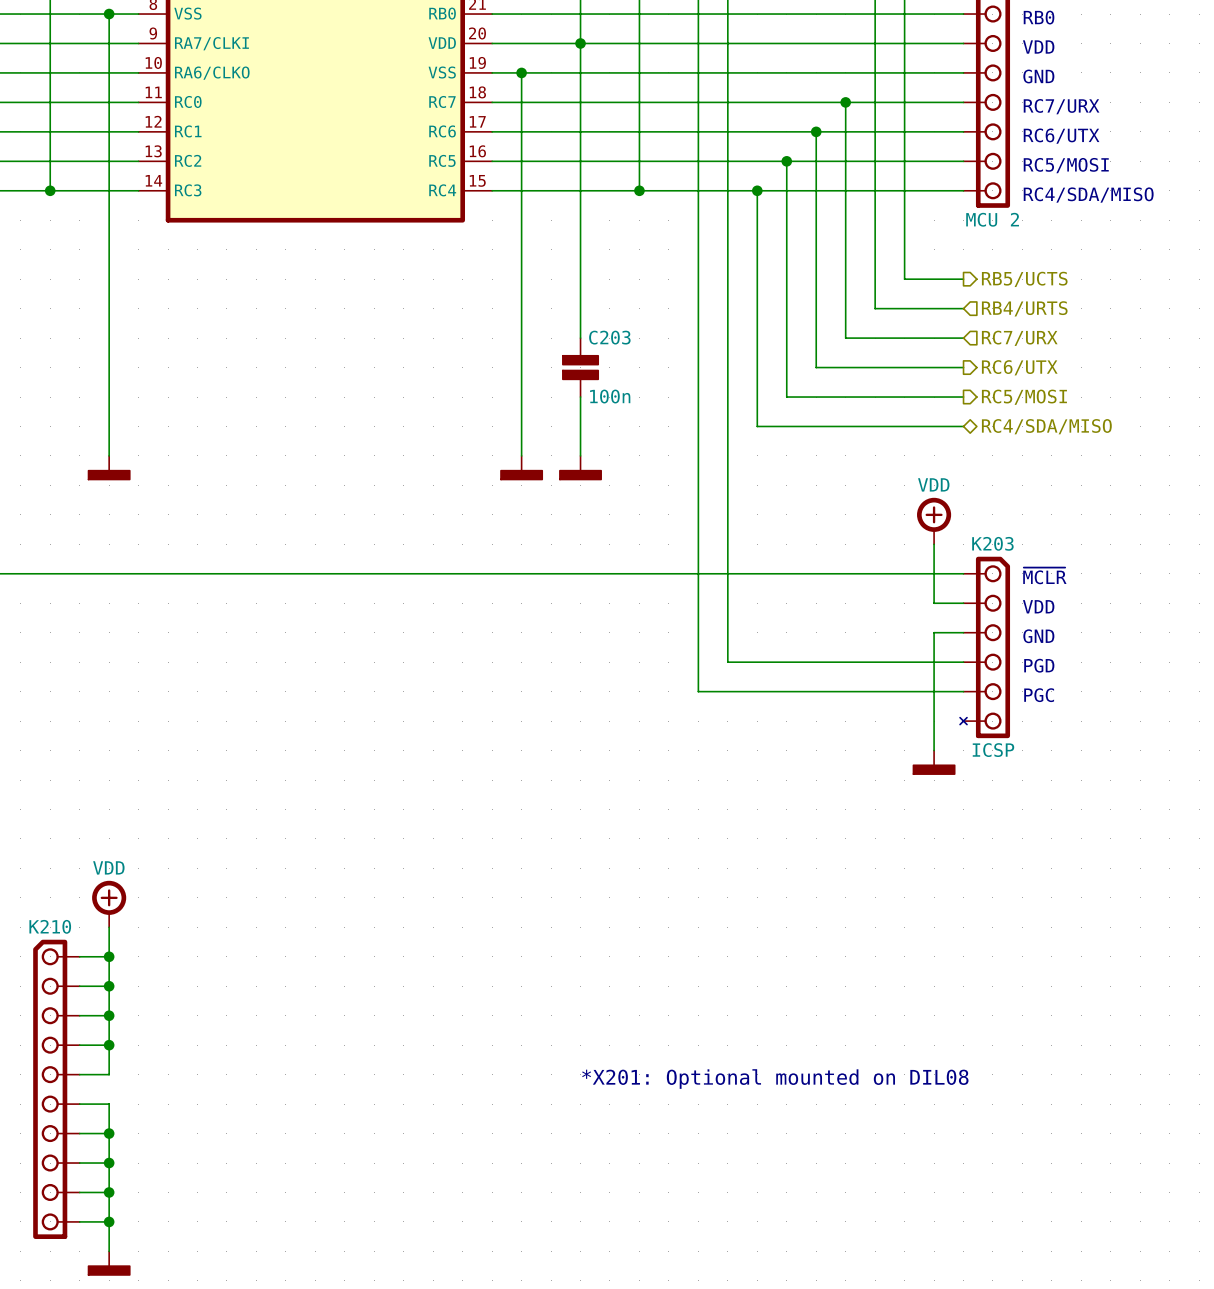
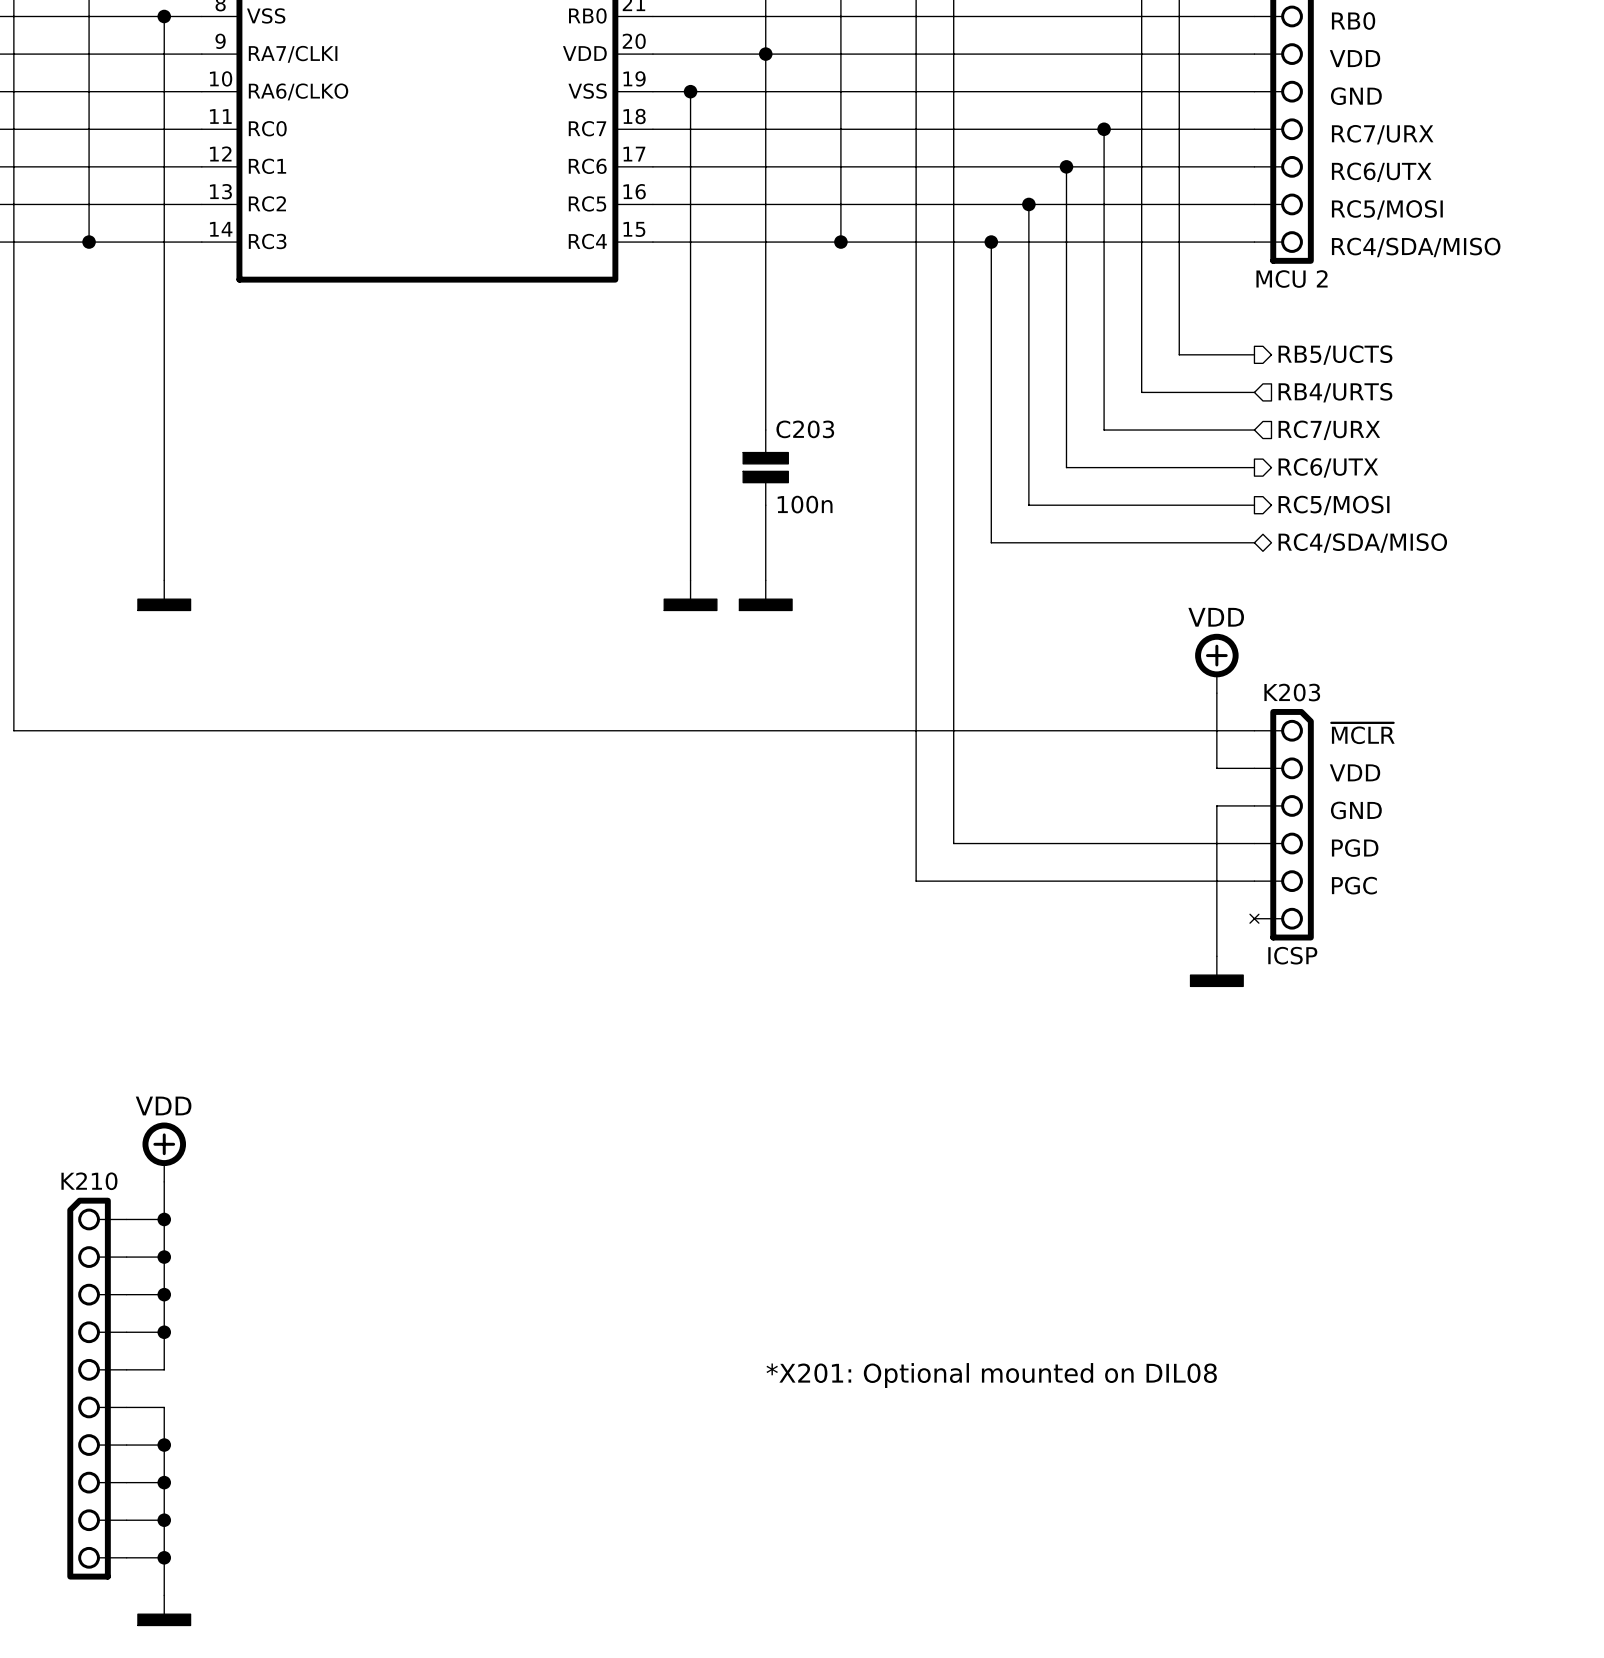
power symbol text: none -> VDD (1216, 617)
power symbol text: VDD (933, 484) -> none
power symbol text: none -> VDD (163, 1105)
power symbol text: VDD (108, 867) -> none

